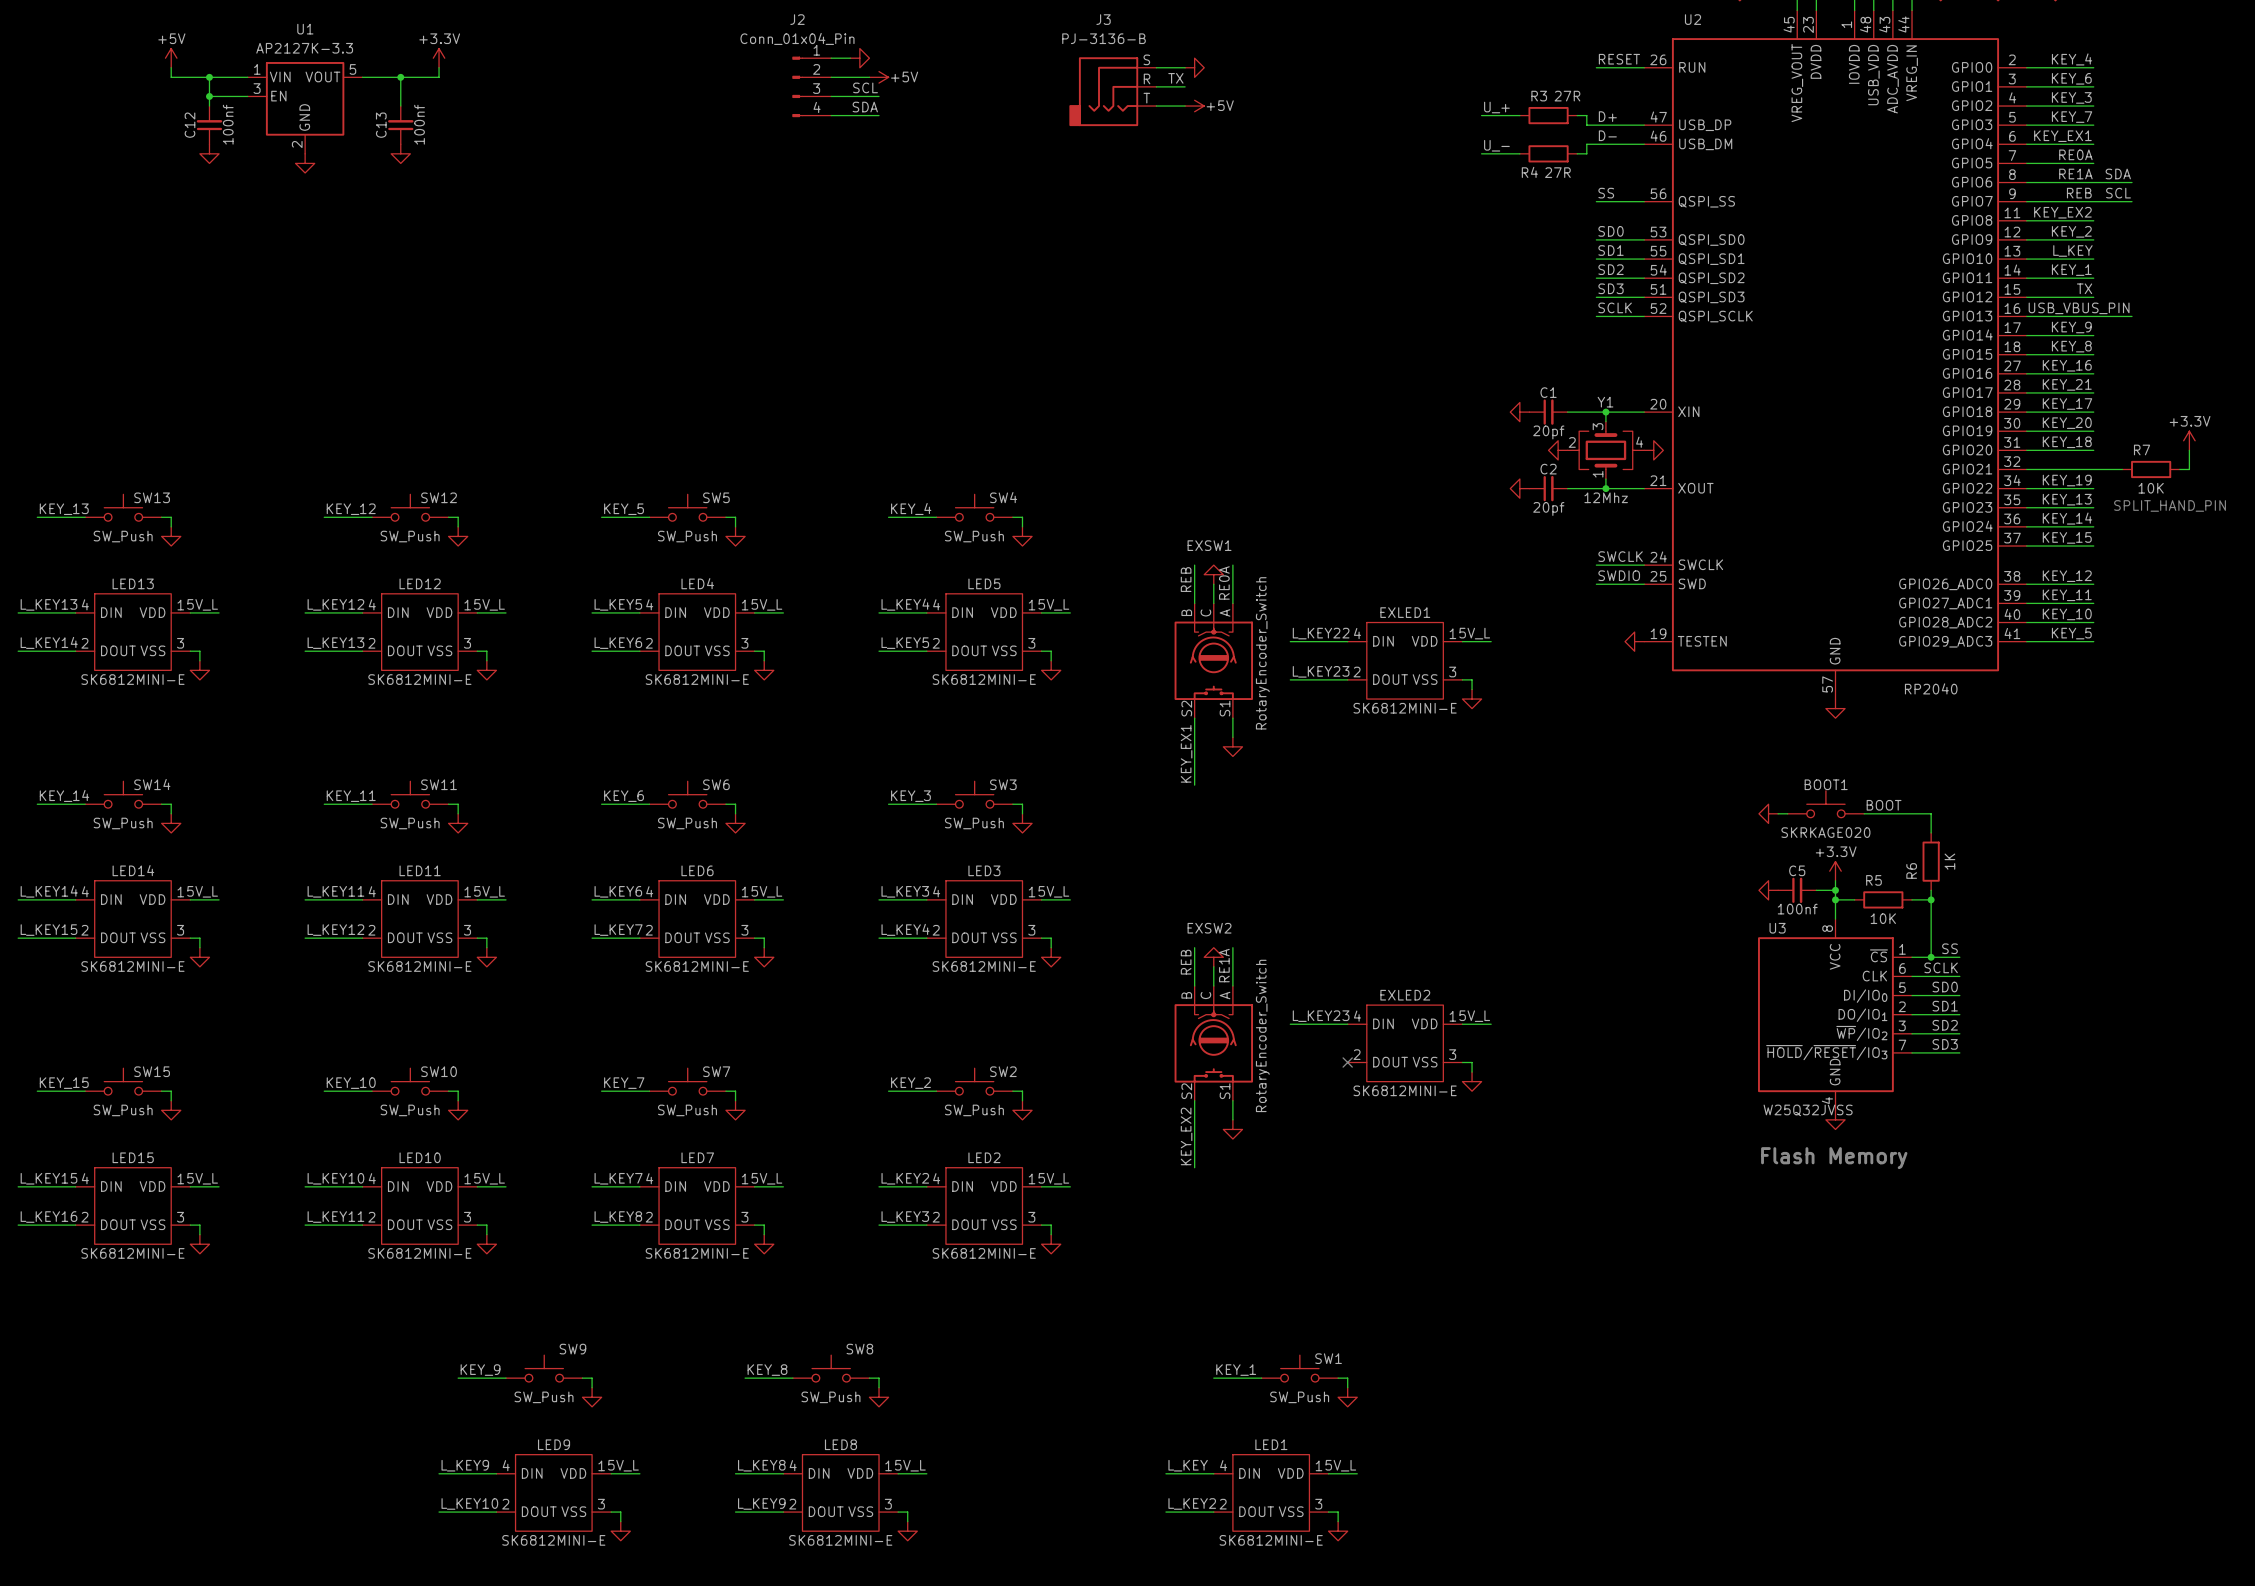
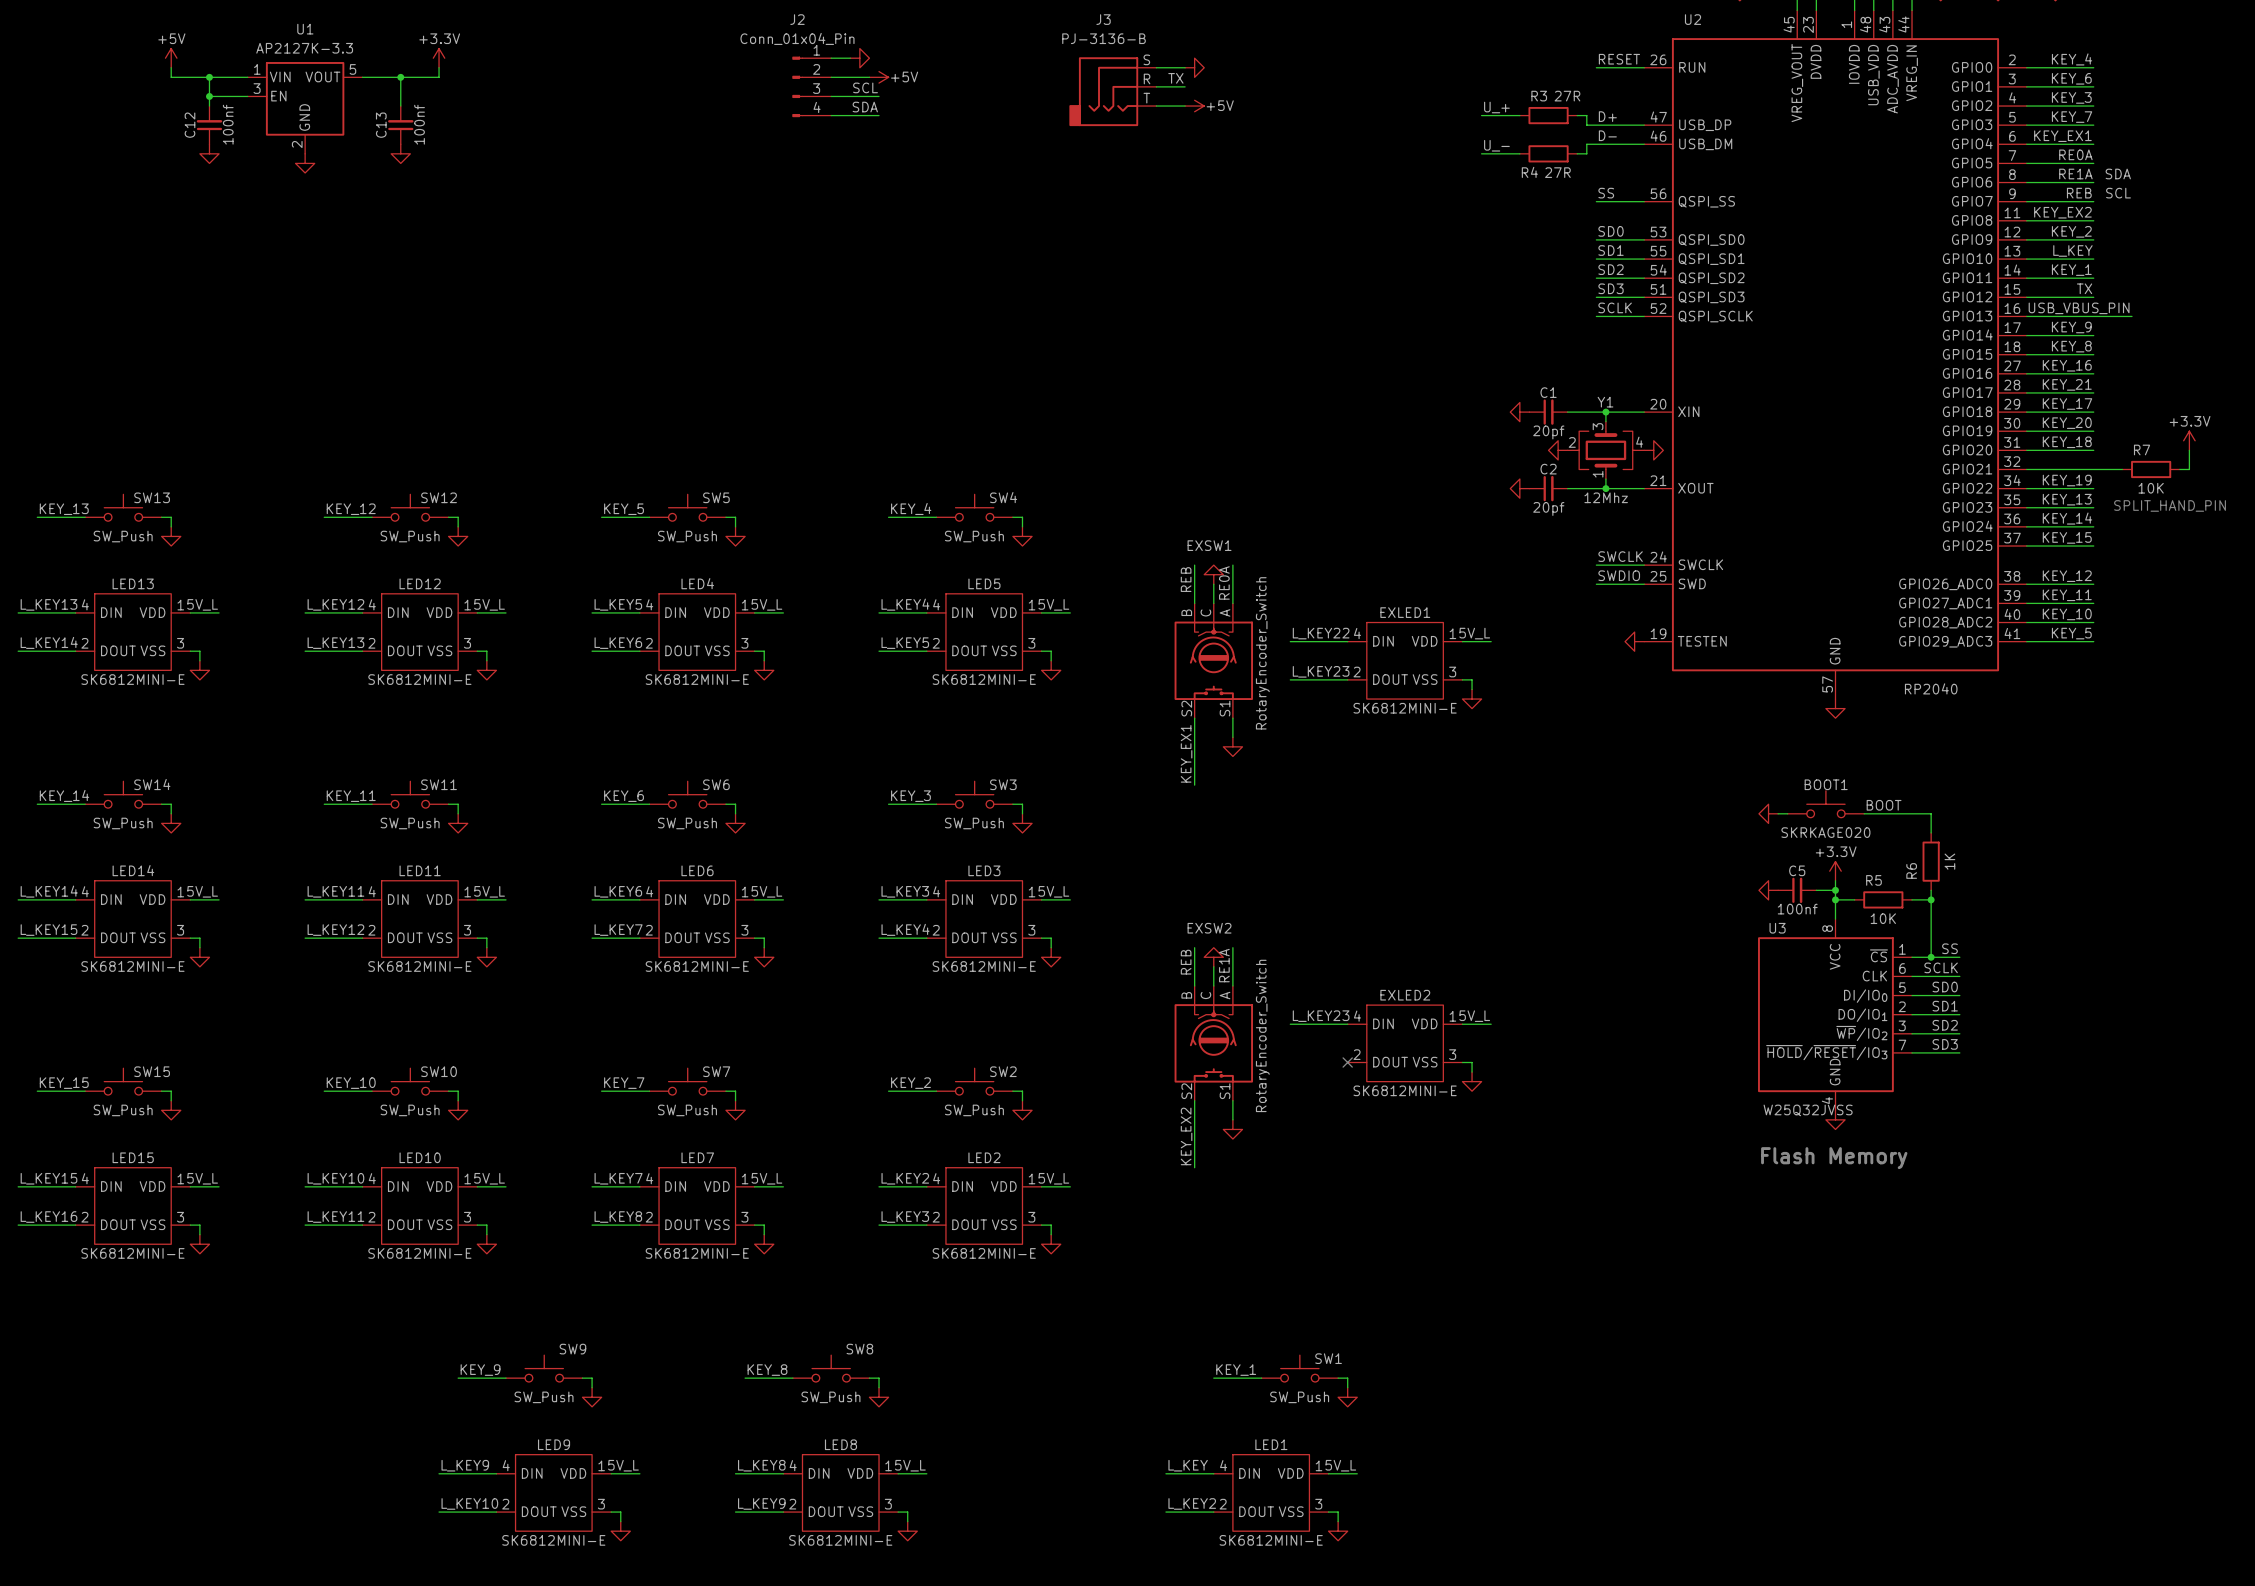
wire: (2093, 182) (2132, 182) -> none
wire: (2093, 201) (2132, 201) -> none

